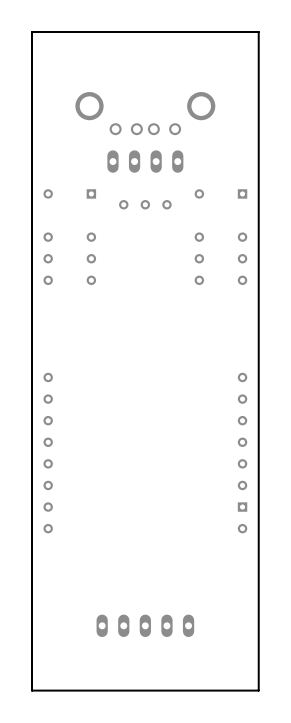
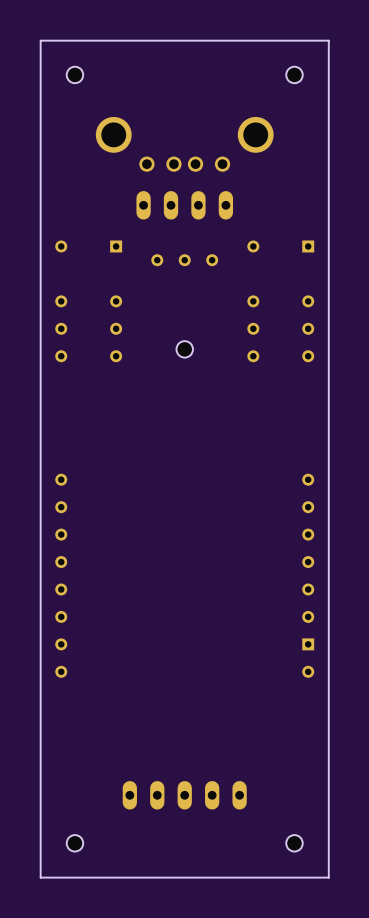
hole: none -> (74, 74)
hole: none -> (294, 74)
hole: none -> (184, 349)
hole: none -> (74, 843)
hole: none -> (294, 843)

